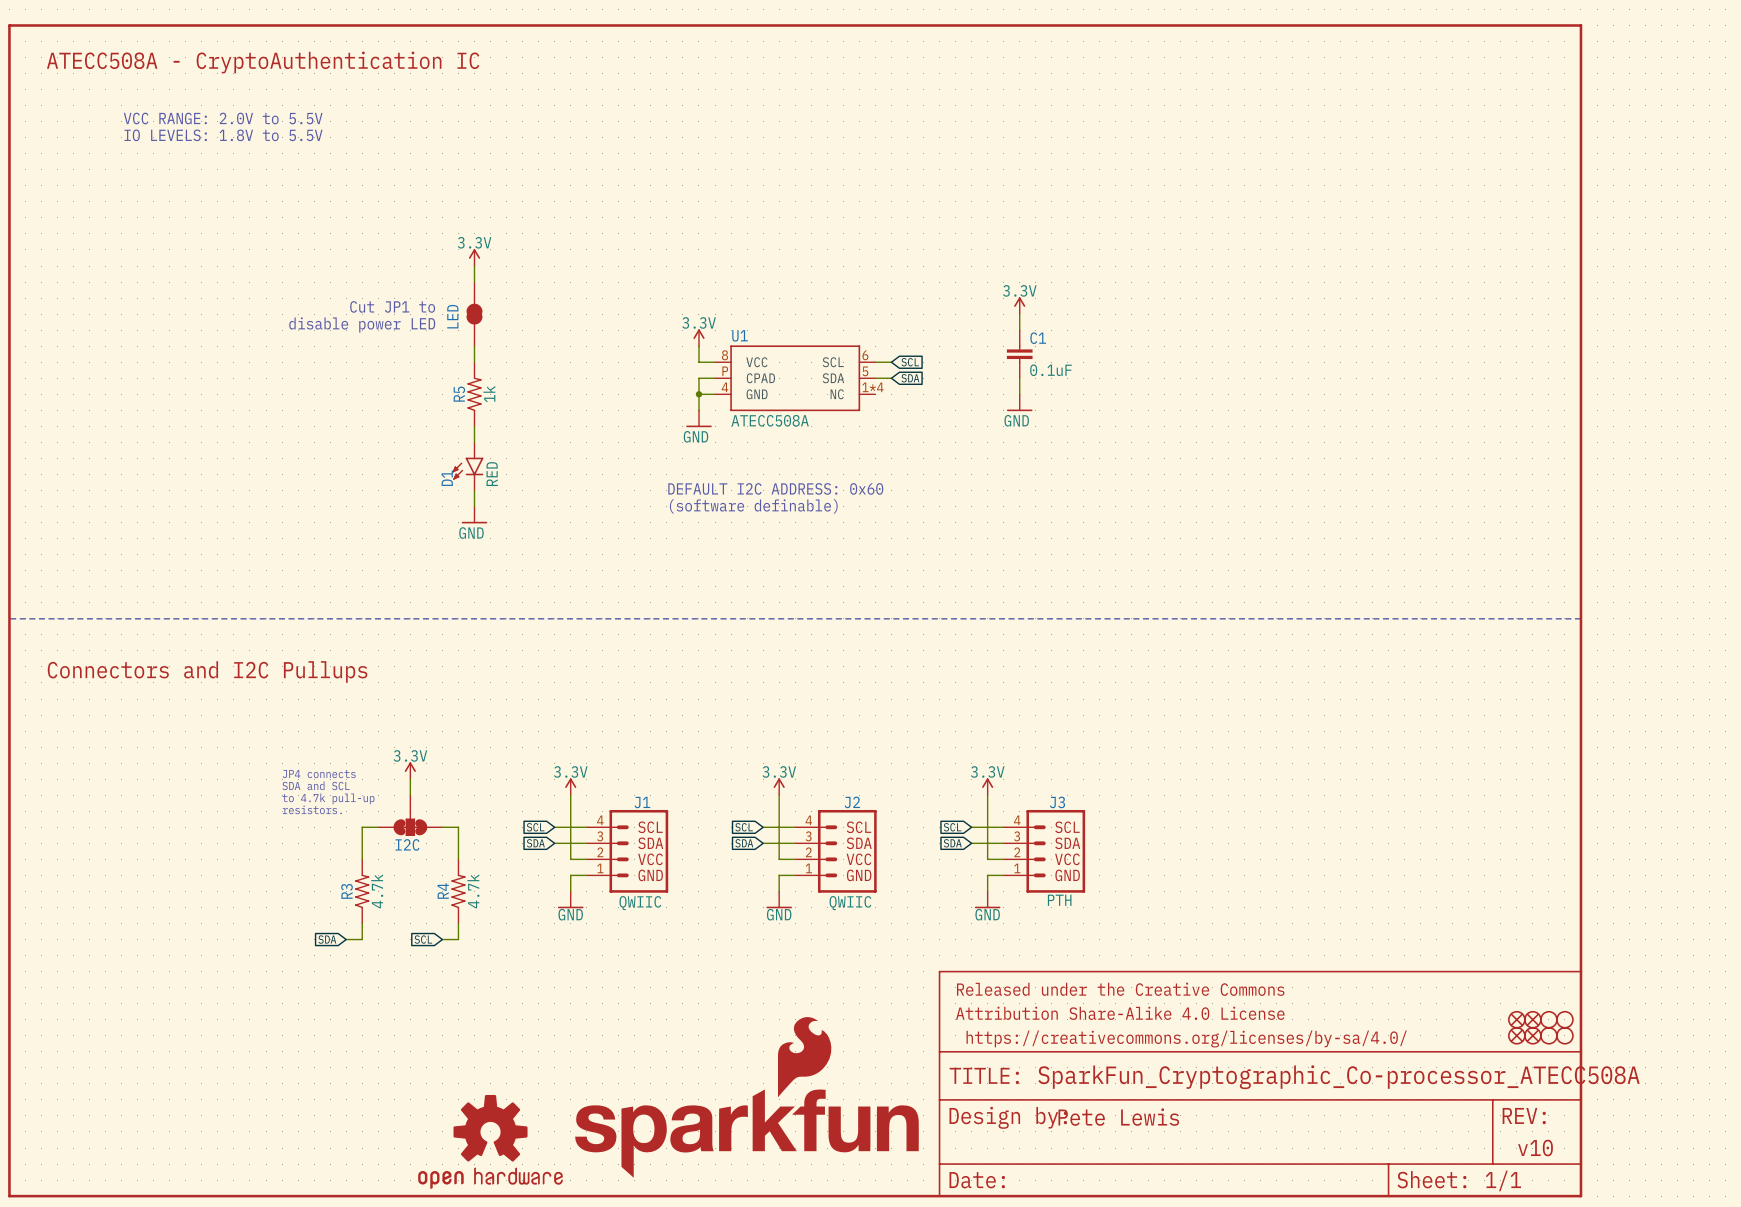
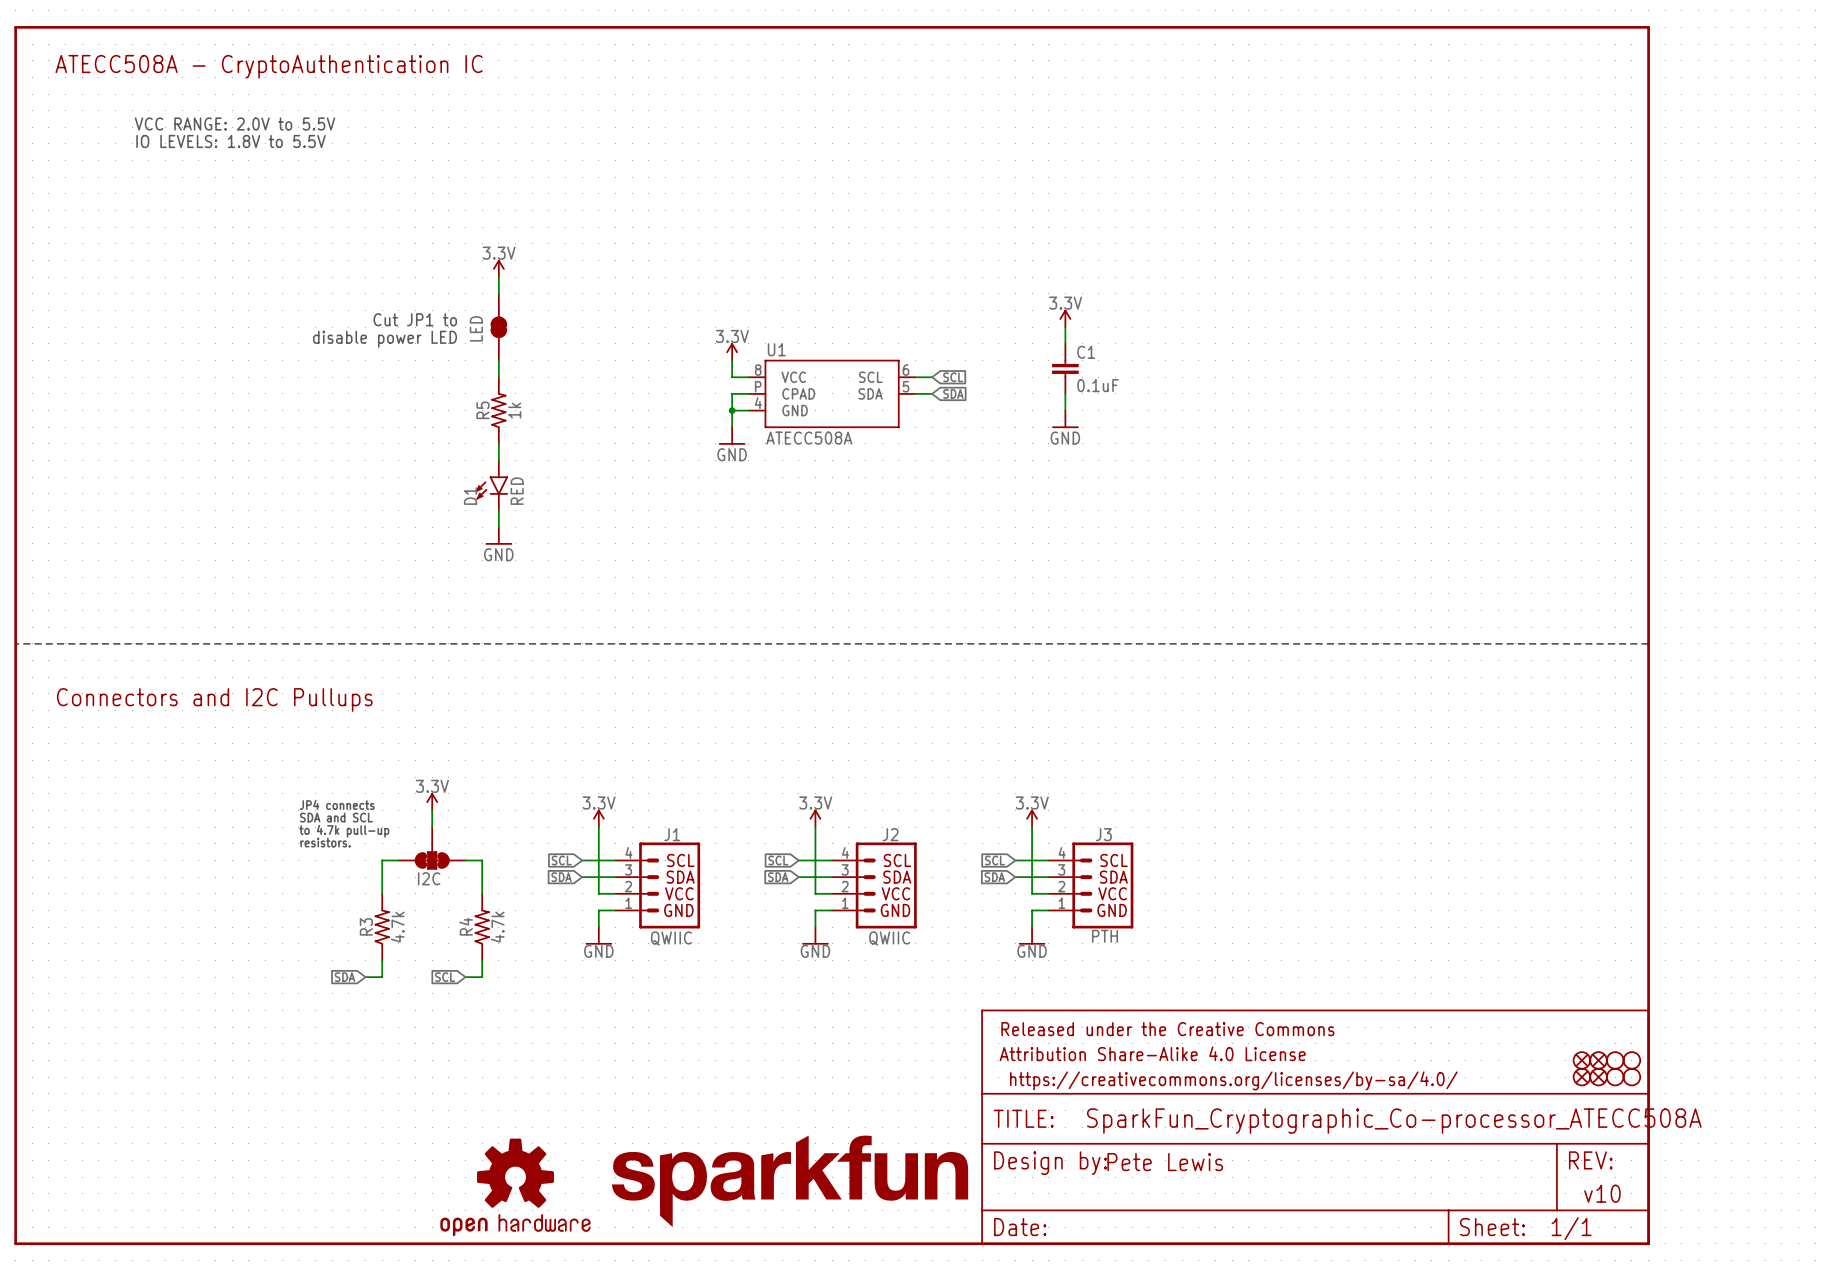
U1 symbol: [715, 345, 876, 412] -> [748, 359, 916, 429]
text: DEFAULT I2C ADDRESS: 0x60 (775, 488) -> none
text: (software definable) (753, 506) -> none
part: (746, 1097) -> none
part: none -> (790, 1181)

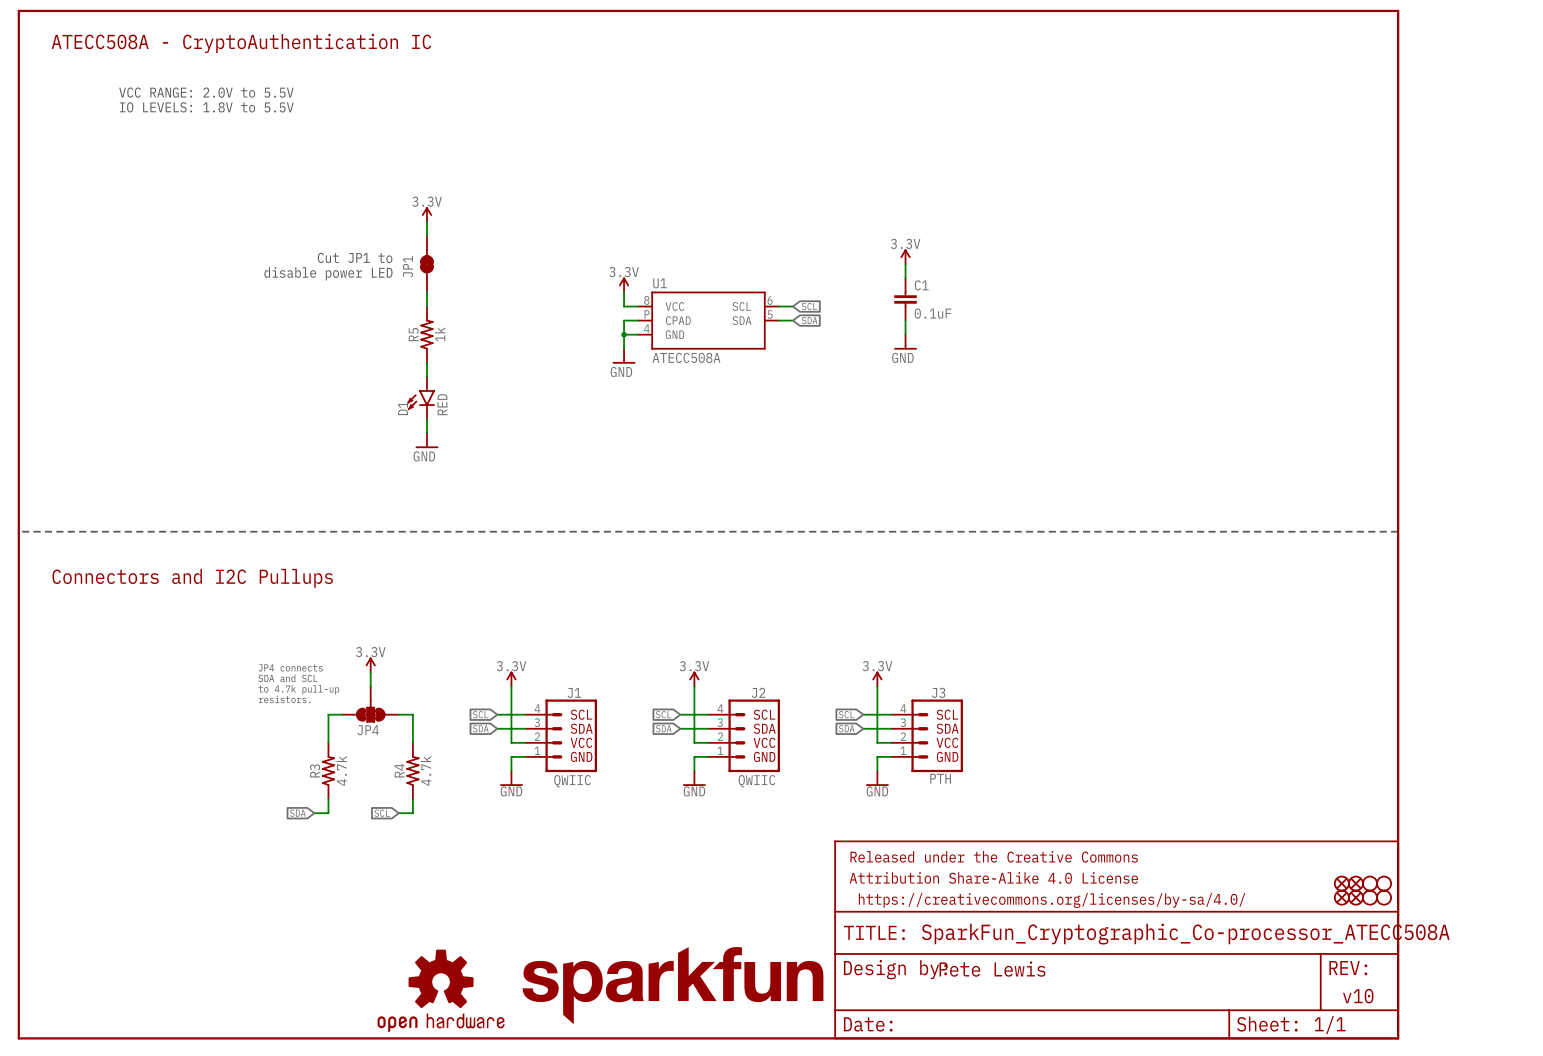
LED name: LED (476, 328) -> JP1 (408, 266)
I2C name: I2C (429, 878) -> JP4 (368, 730)

